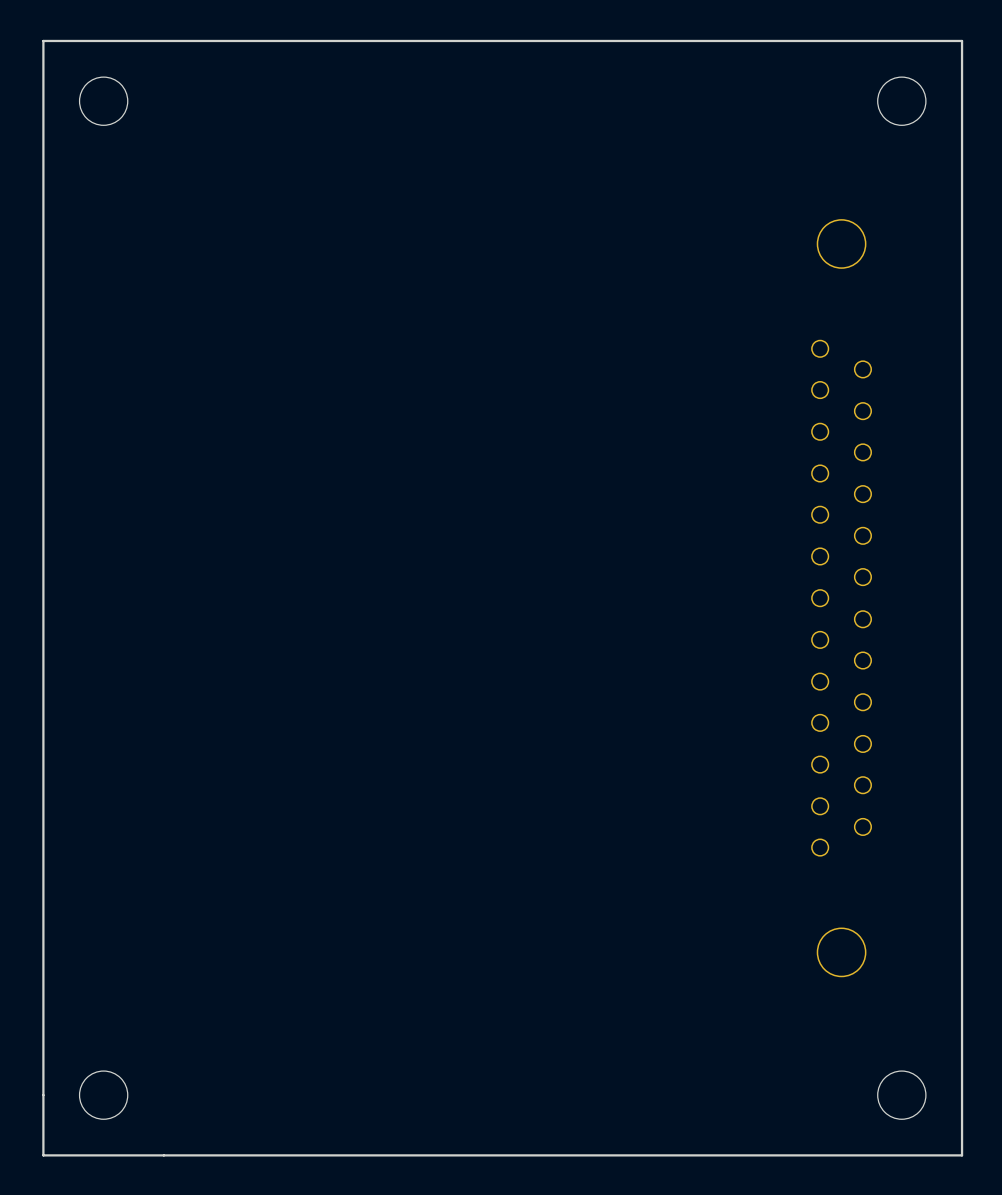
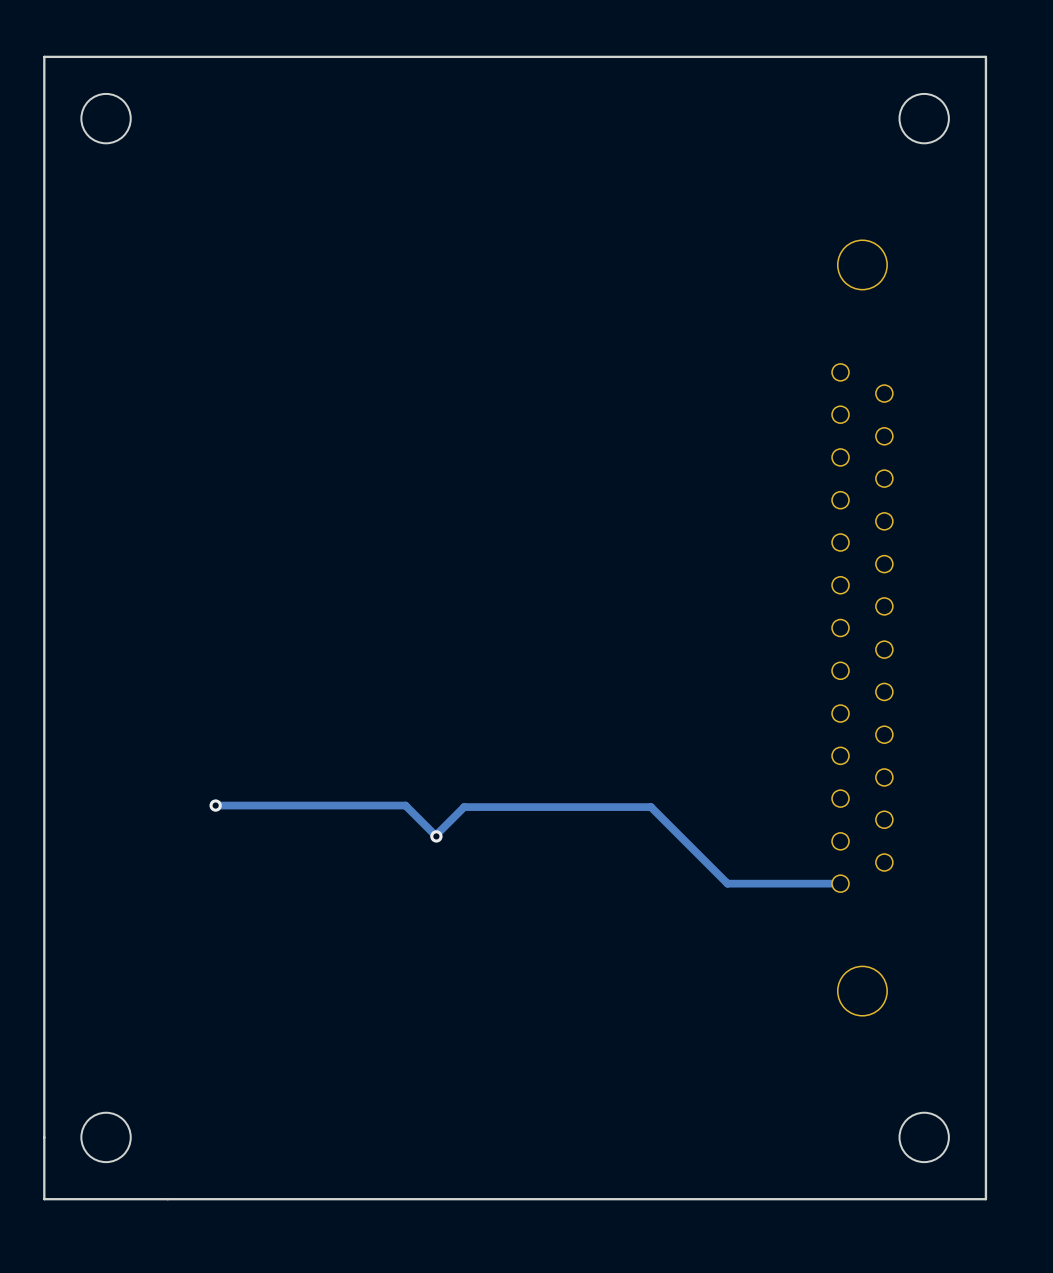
track: none -> (215, 805) (405, 805) (436, 836) (464, 807) (650, 807) (727, 883) (840, 883)
via: none -> (215, 805)
via: none -> (436, 836)

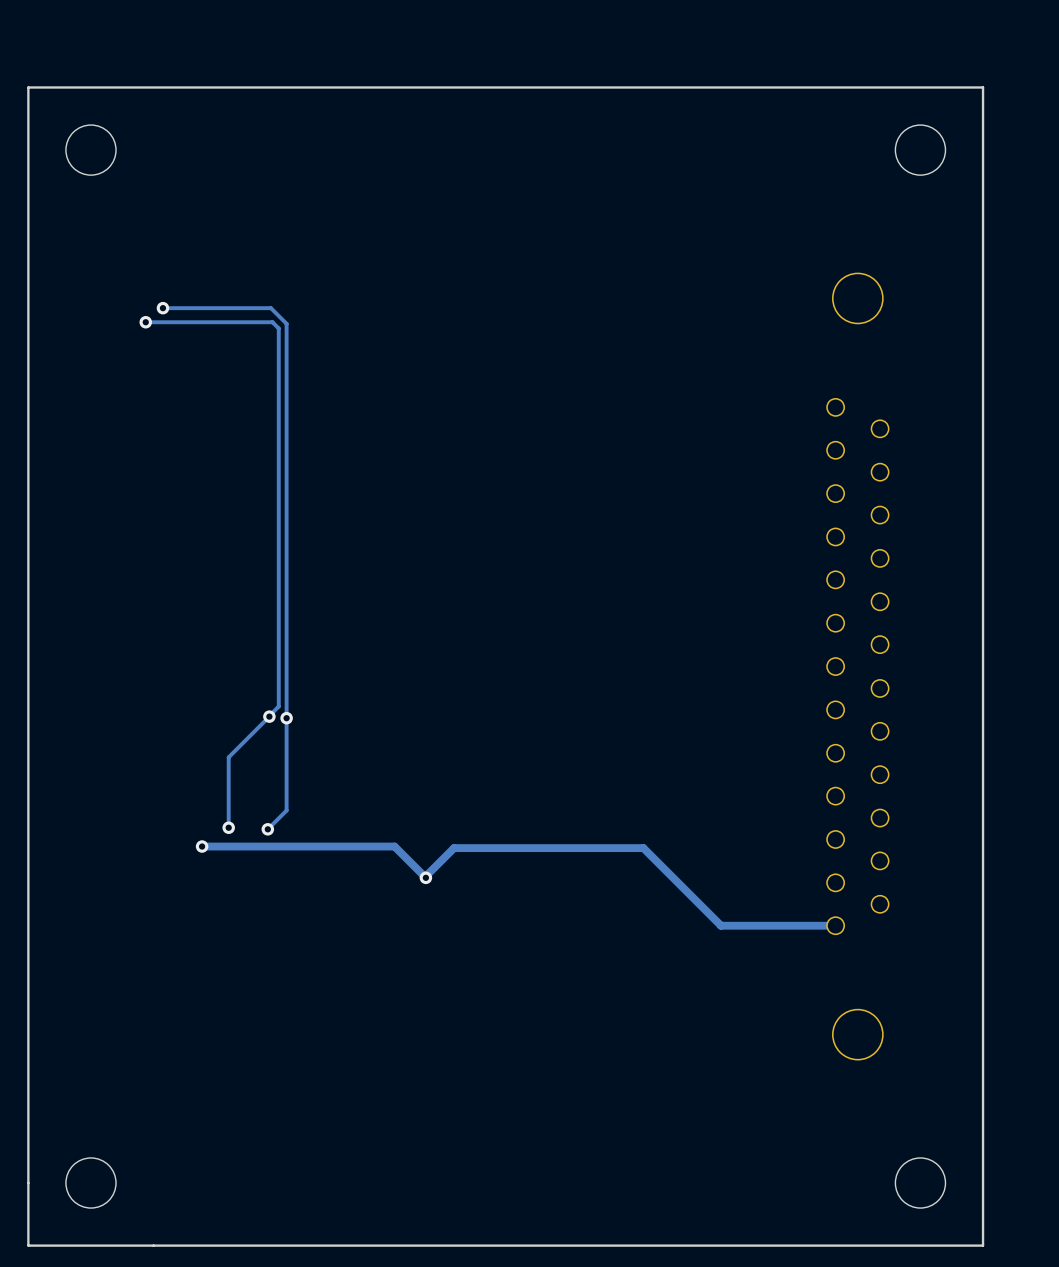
track: none -> (162, 308) (270, 308) (286, 323) (286, 810) (267, 829)
via: none -> (162, 308)
track: none -> (145, 322) (272, 322) (278, 328) (278, 706) (228, 757) (228, 827)
via: none -> (145, 322)
via: none -> (269, 716)
via: none -> (286, 718)
via: none -> (228, 827)
via: none -> (267, 829)

